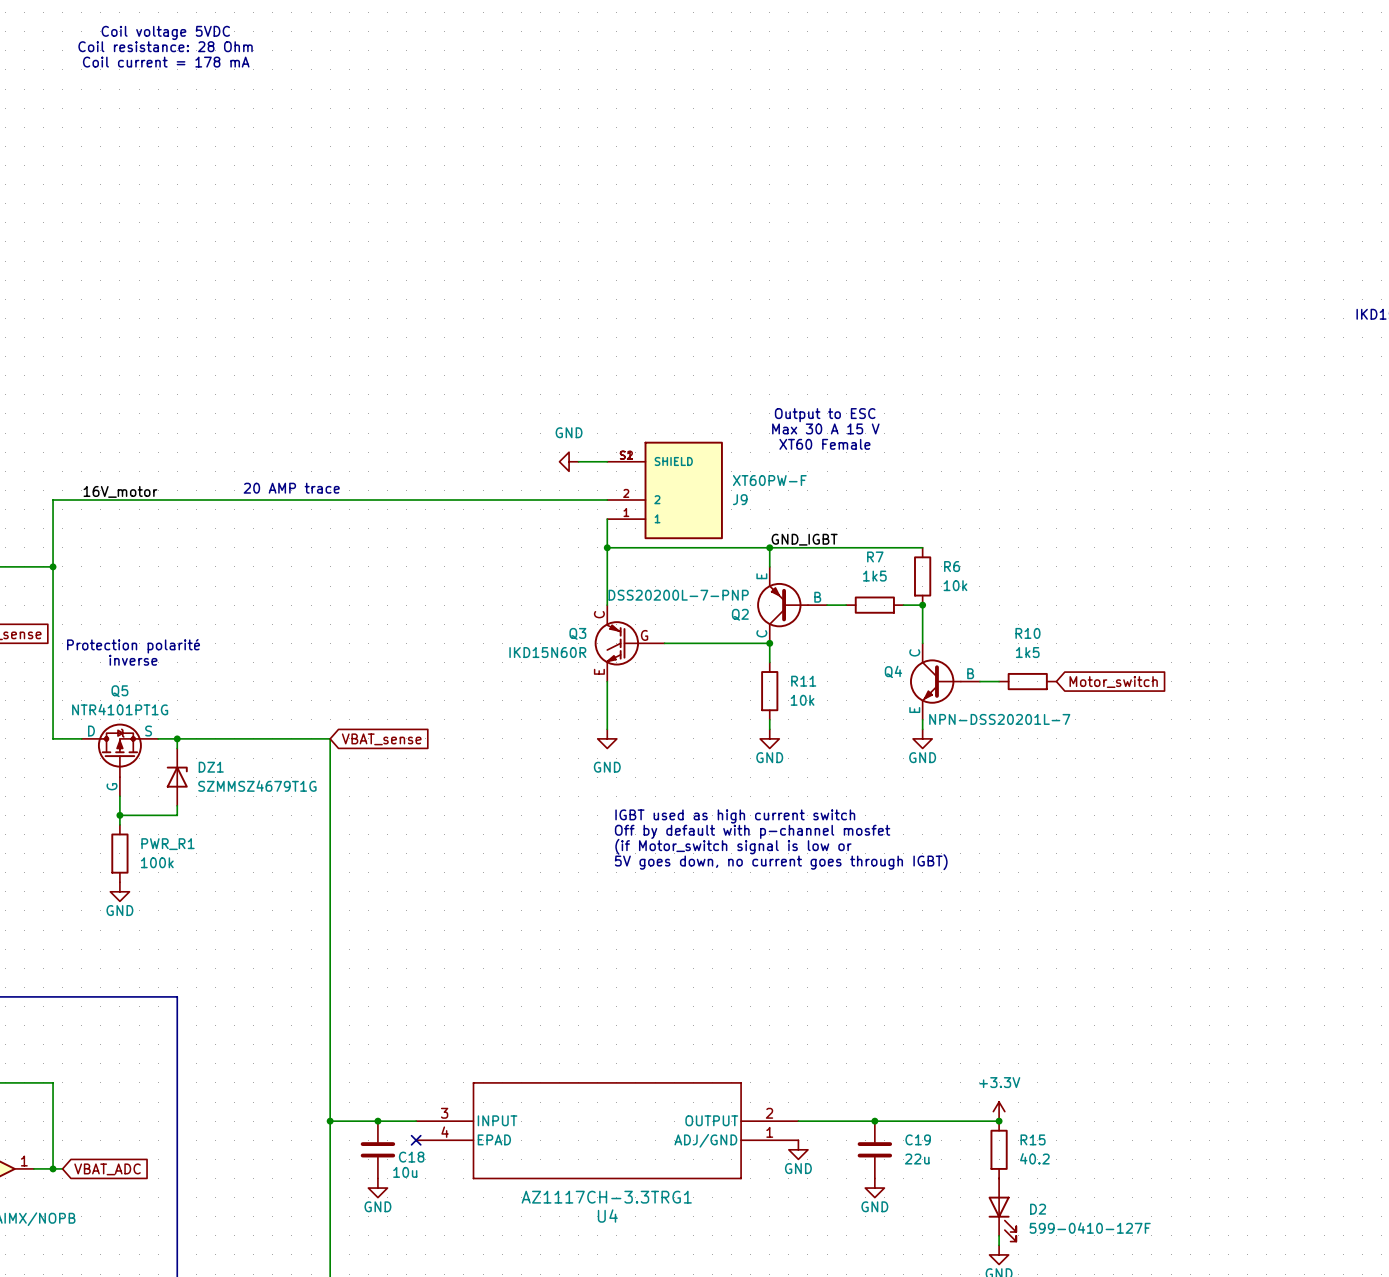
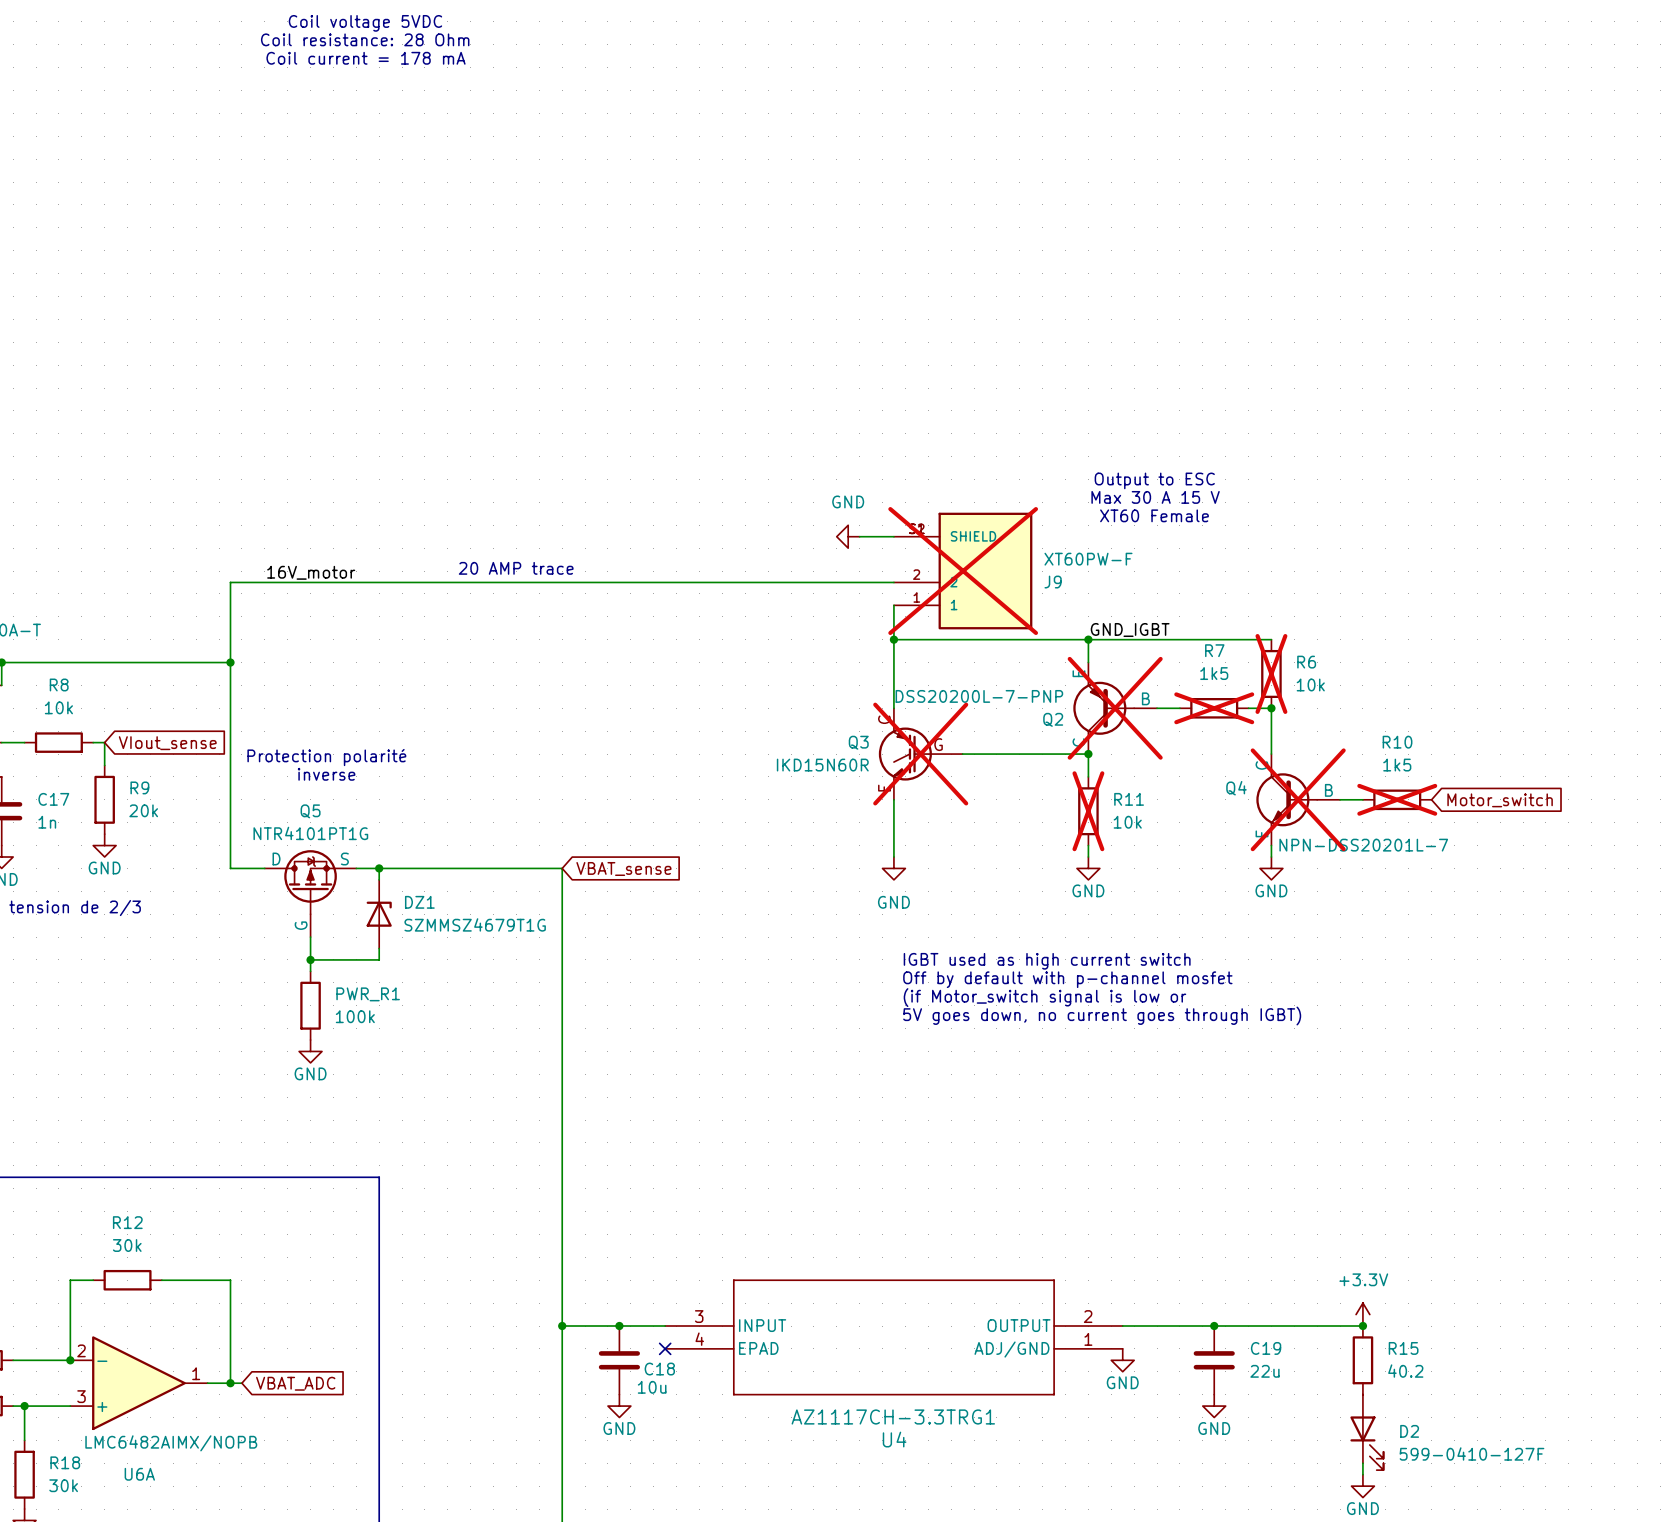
J9 do-not-place cross: none -> (963, 571)
R6 do-not-place cross: none -> (1271, 673)
Q2 do-not-place cross: none -> (1115, 708)
R7 do-not-place cross: none -> (1214, 708)
Q3 do-not-place cross: none -> (920, 754)
Q4 do-not-place cross: none -> (1298, 799)
R10 do-not-place cross: none -> (1397, 799)
R11 do-not-place cross: none -> (1088, 811)

